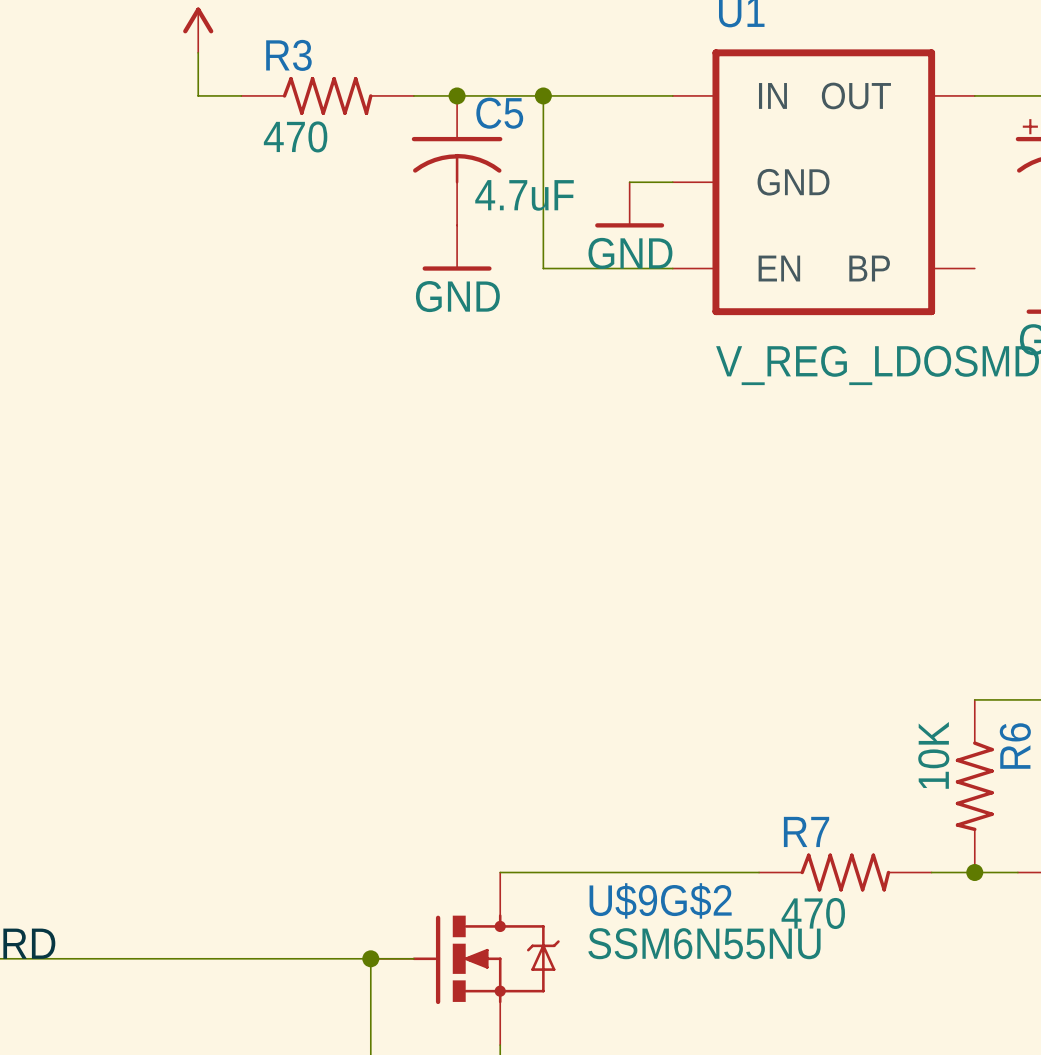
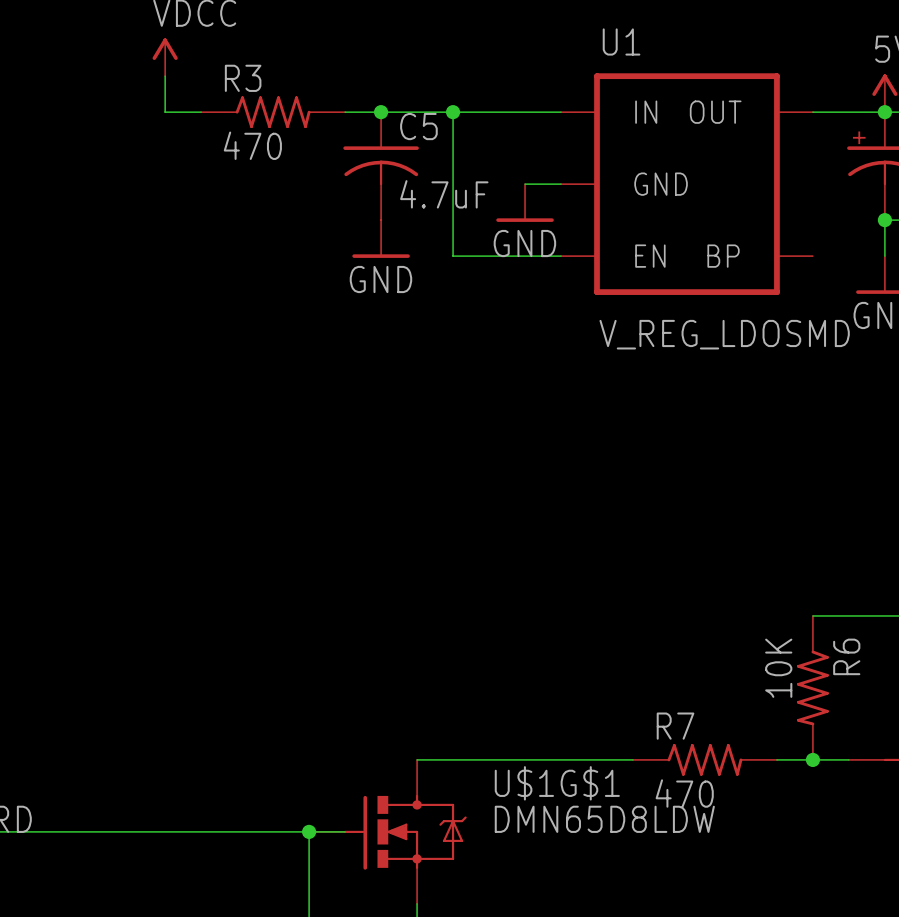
U$9G$2 name: U$9G$2 (660, 900) -> U$1G$1 (557, 783)
U$9G$2 value: SSM6N55NU (704, 943) -> DMN65D8LDW (604, 819)

